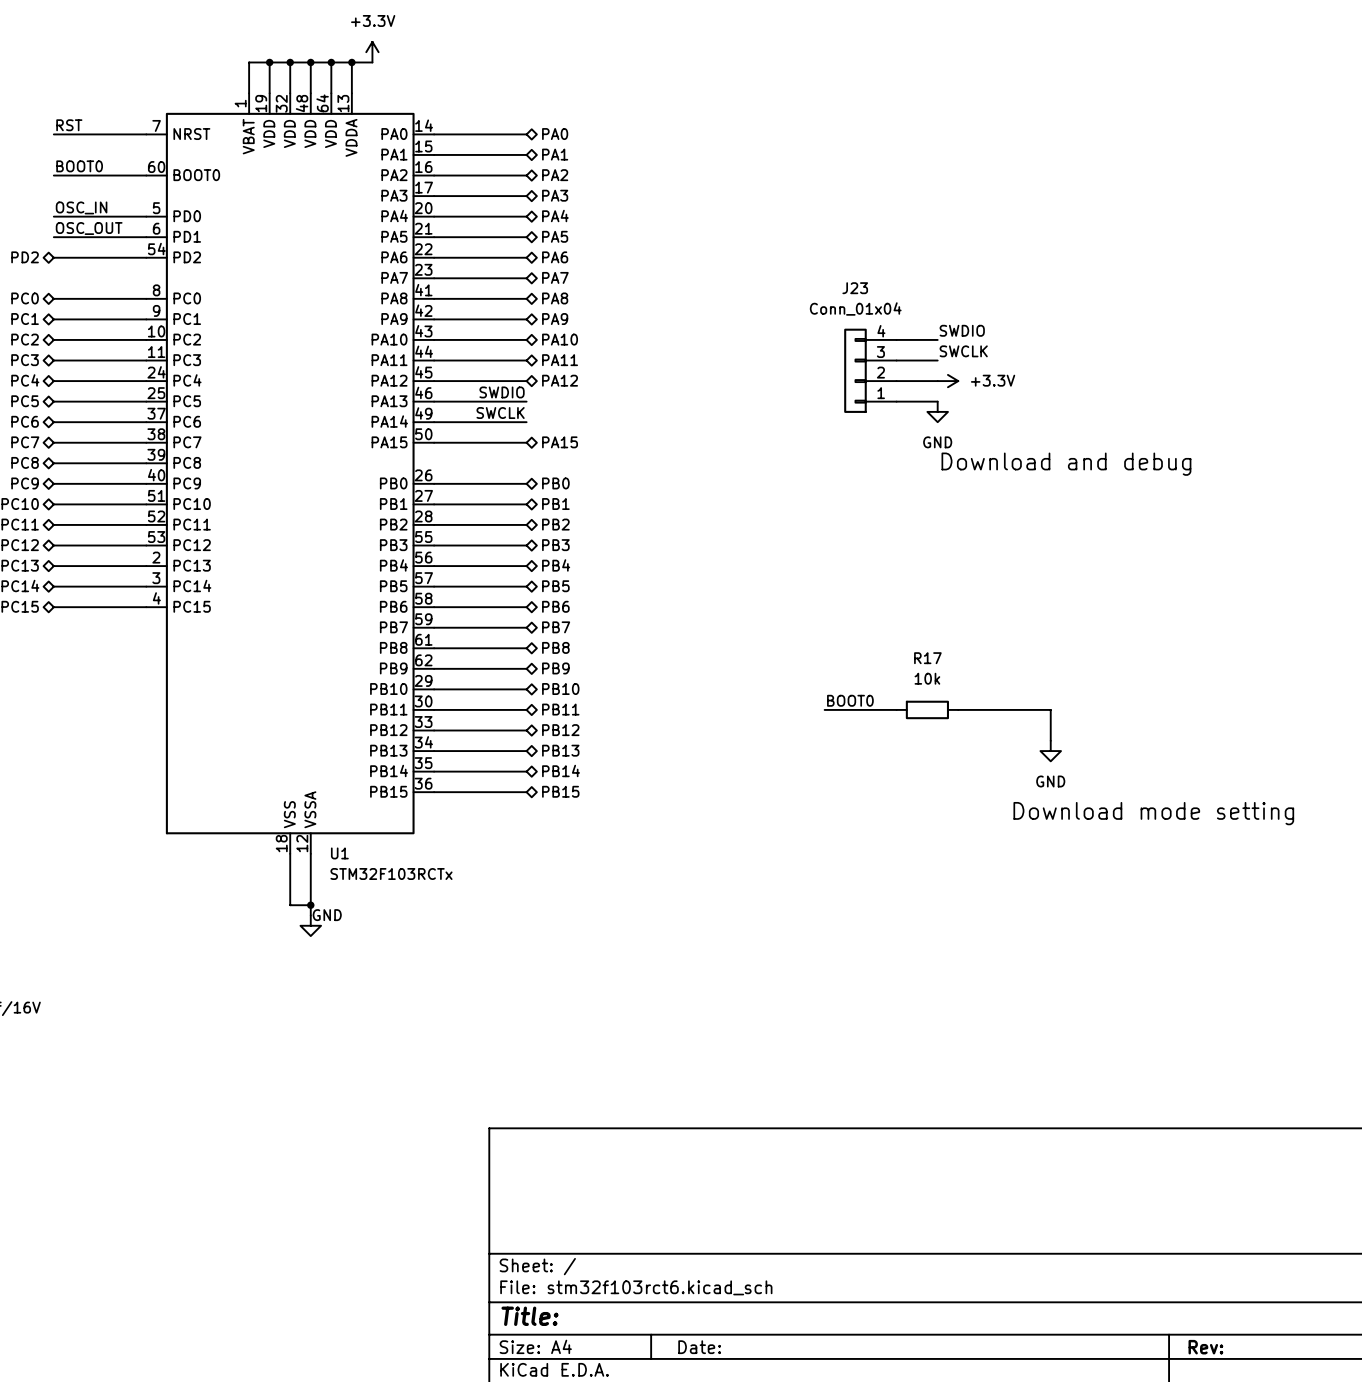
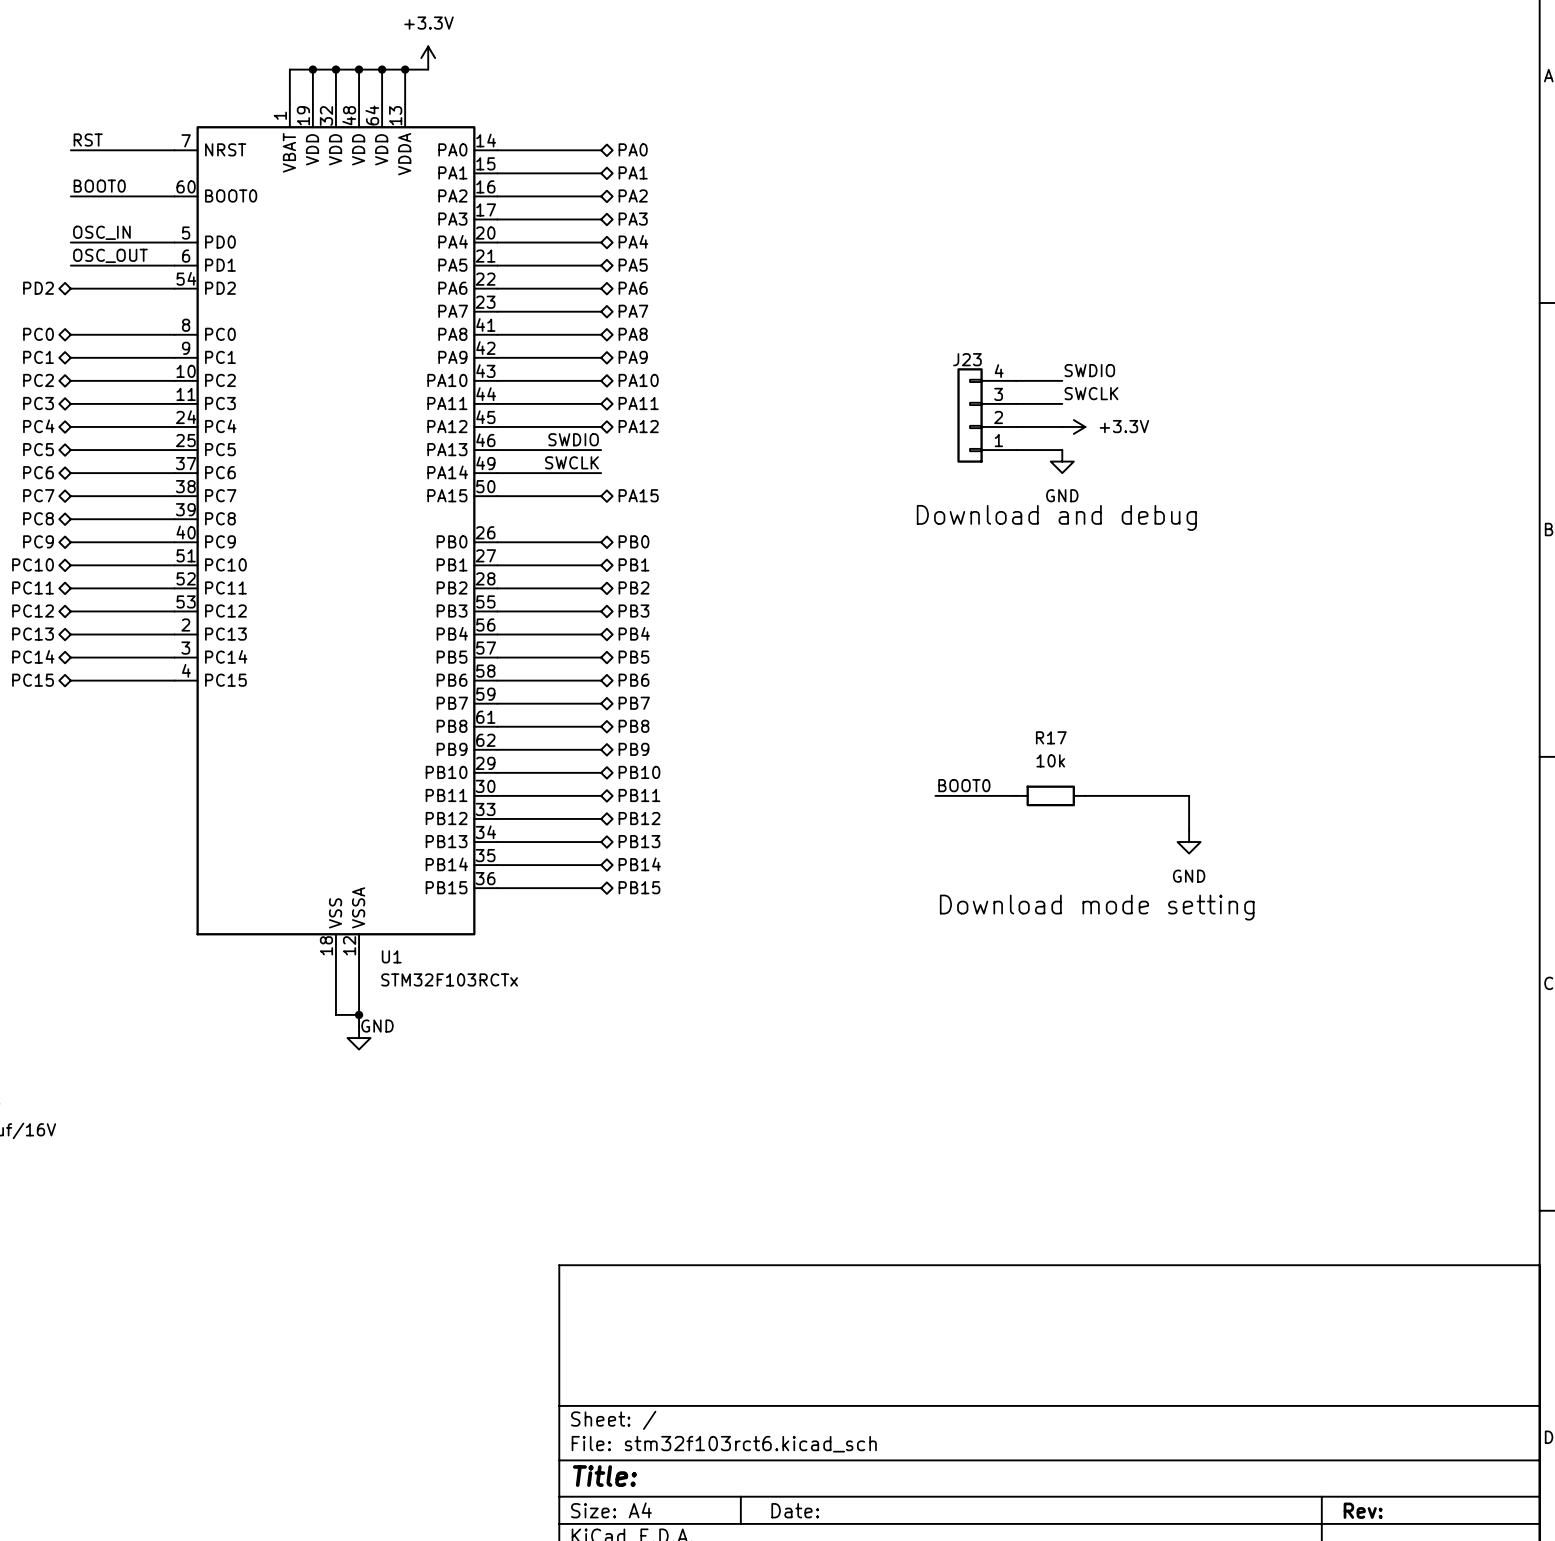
J23 name position: J23 (855, 288) -> J23 (967, 359)
J23 value: Conn_01x04 (855, 308) -> none
text position: Download and debug (1066, 464) -> Download and debug (1056, 517)
text position: Download mode setting (1153, 813) -> Download mode setting (1097, 907)

